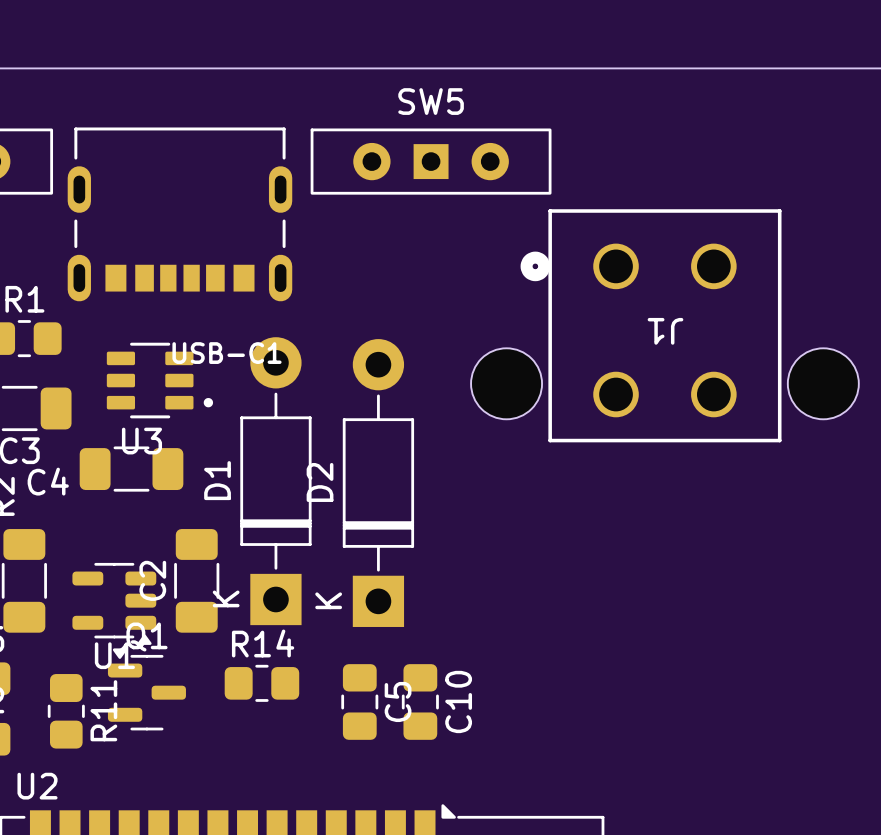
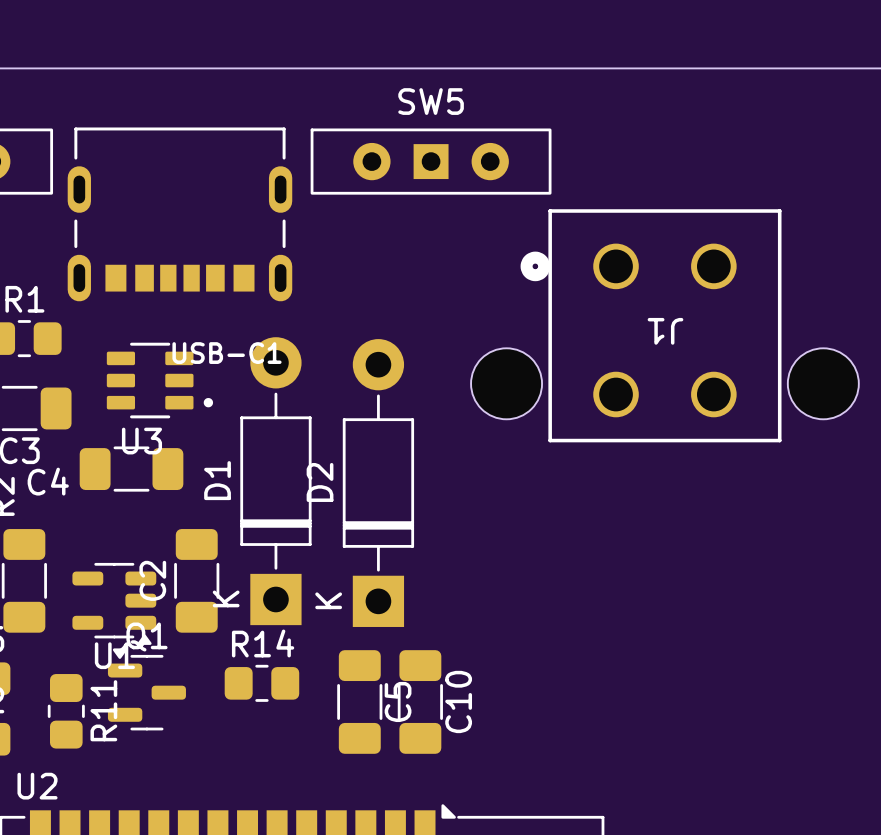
C5 footprint: [341, 664, 379, 740] -> [337, 650, 383, 754]
C10 footprint: [401, 664, 439, 740] -> [397, 650, 443, 754]

